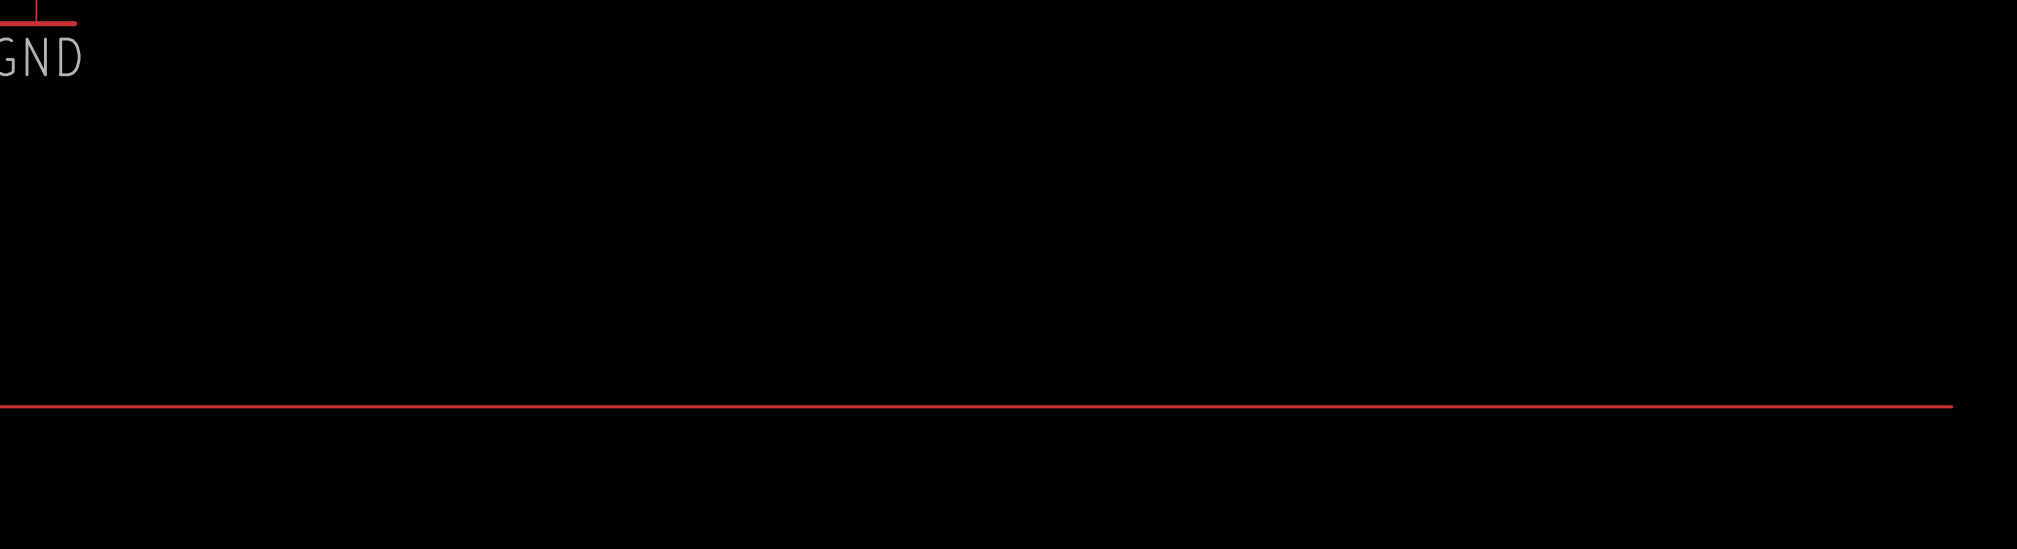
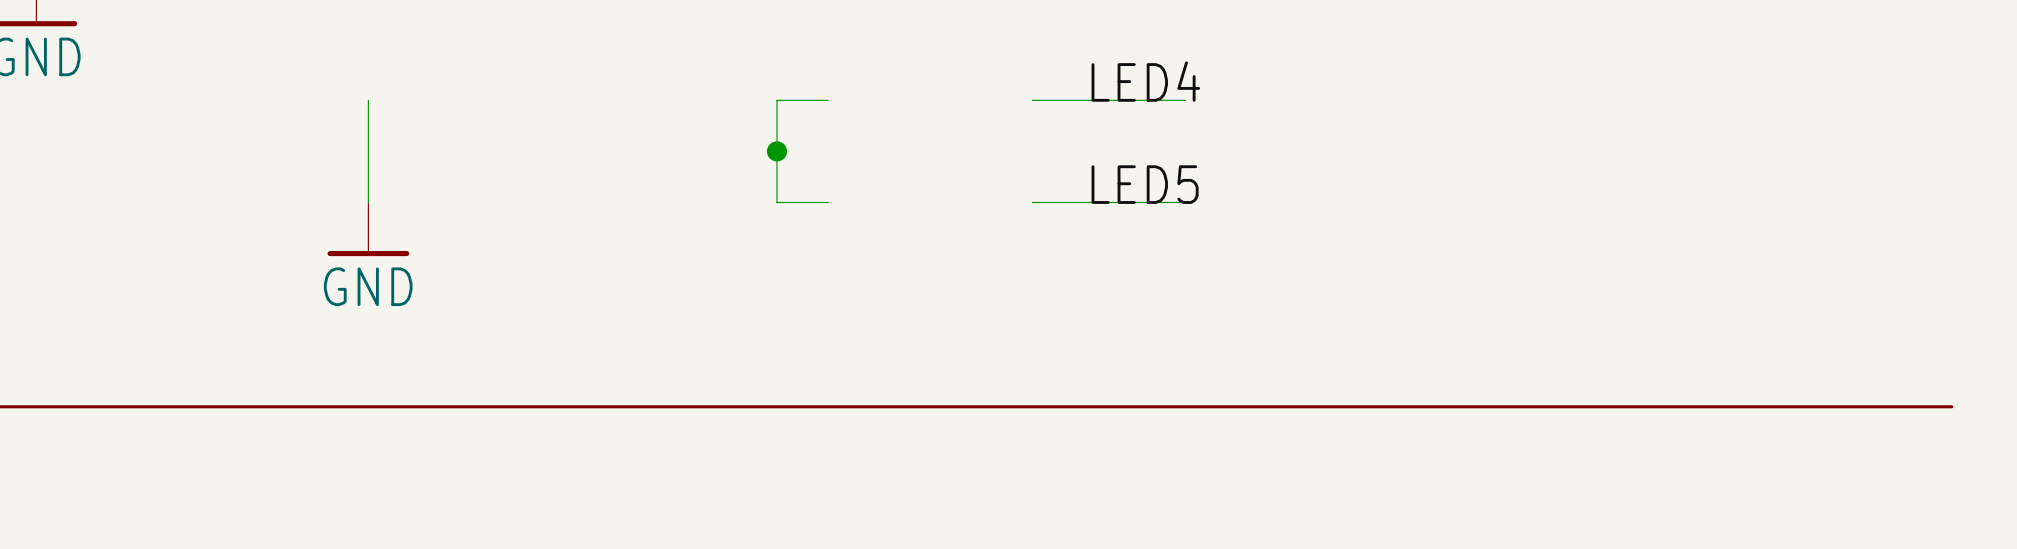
label: none -> LED4 (1145, 81)
wire: none -> (368, 100) (368, 202)
wire: none -> (828, 100) (776, 100) (776, 202) (828, 202)
wire: none -> (1032, 100) (1185, 100)
junction: none -> (776, 151)
label: none -> LED5 (1145, 184)
wire: none -> (1032, 202) (1185, 202)
power symbol: none -> GND (368, 229)

